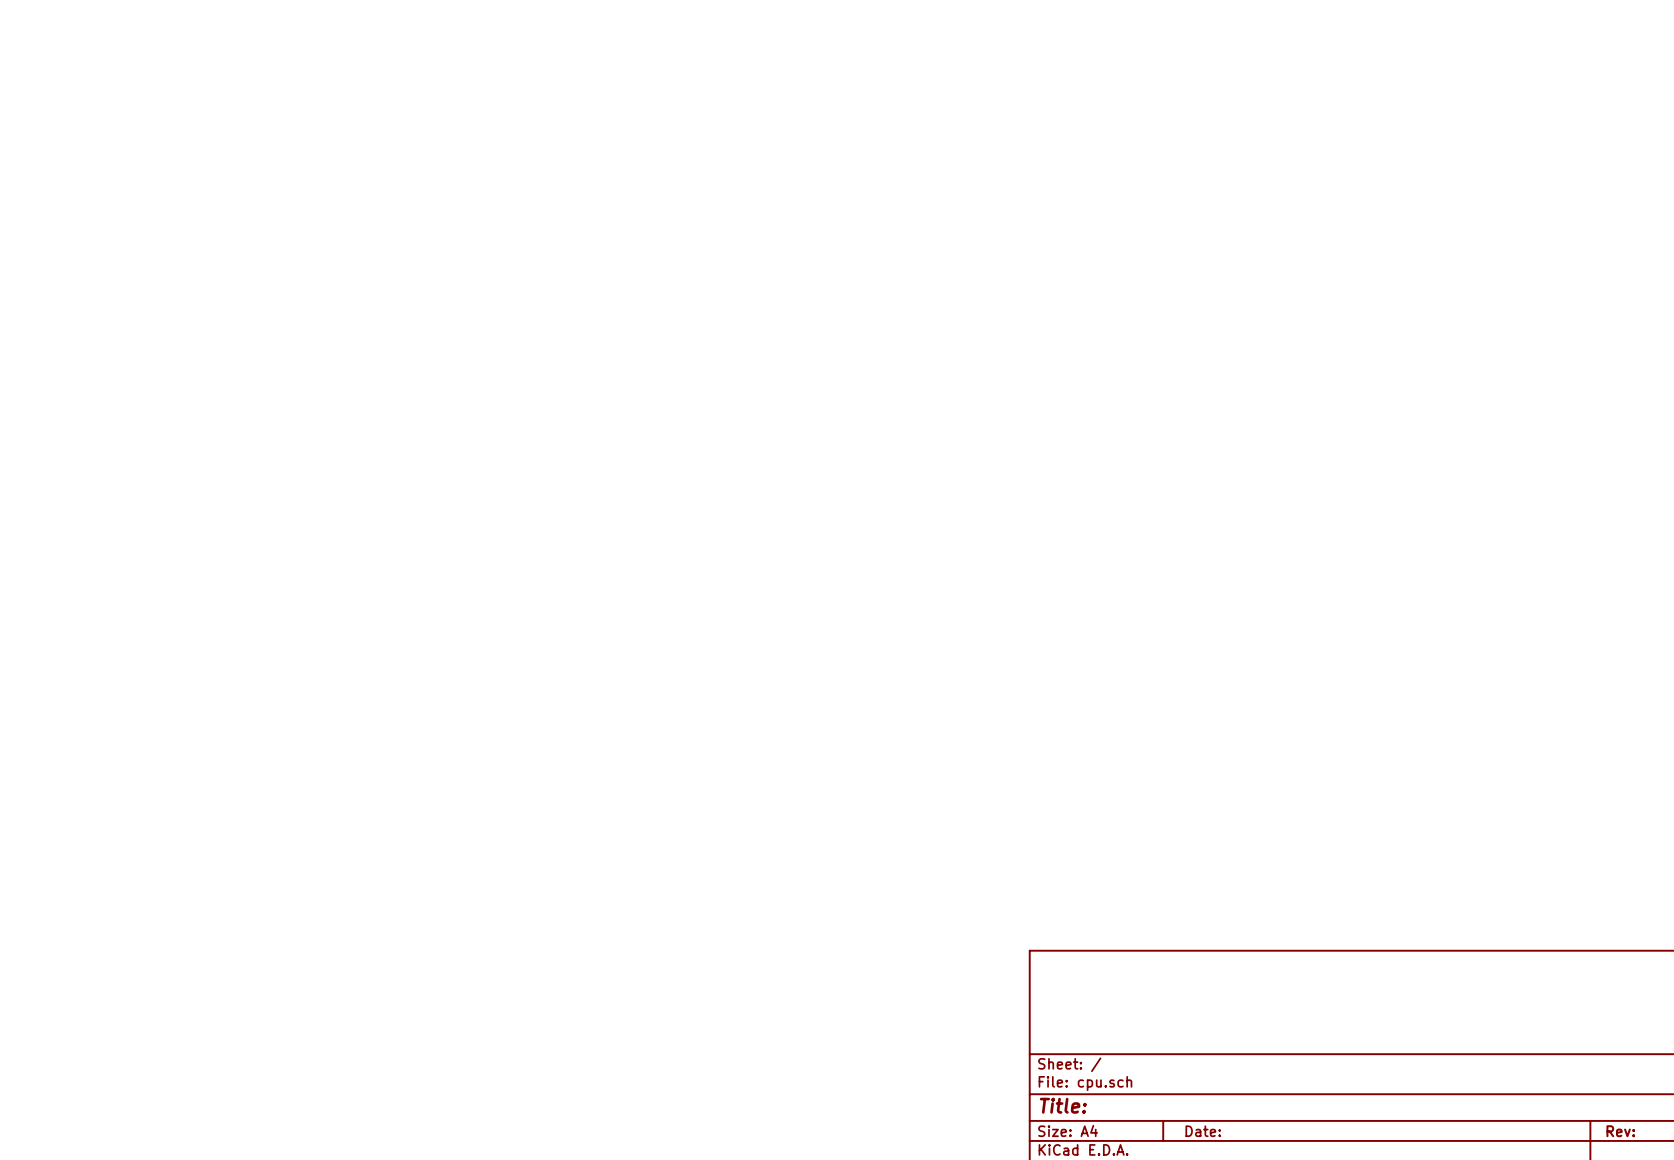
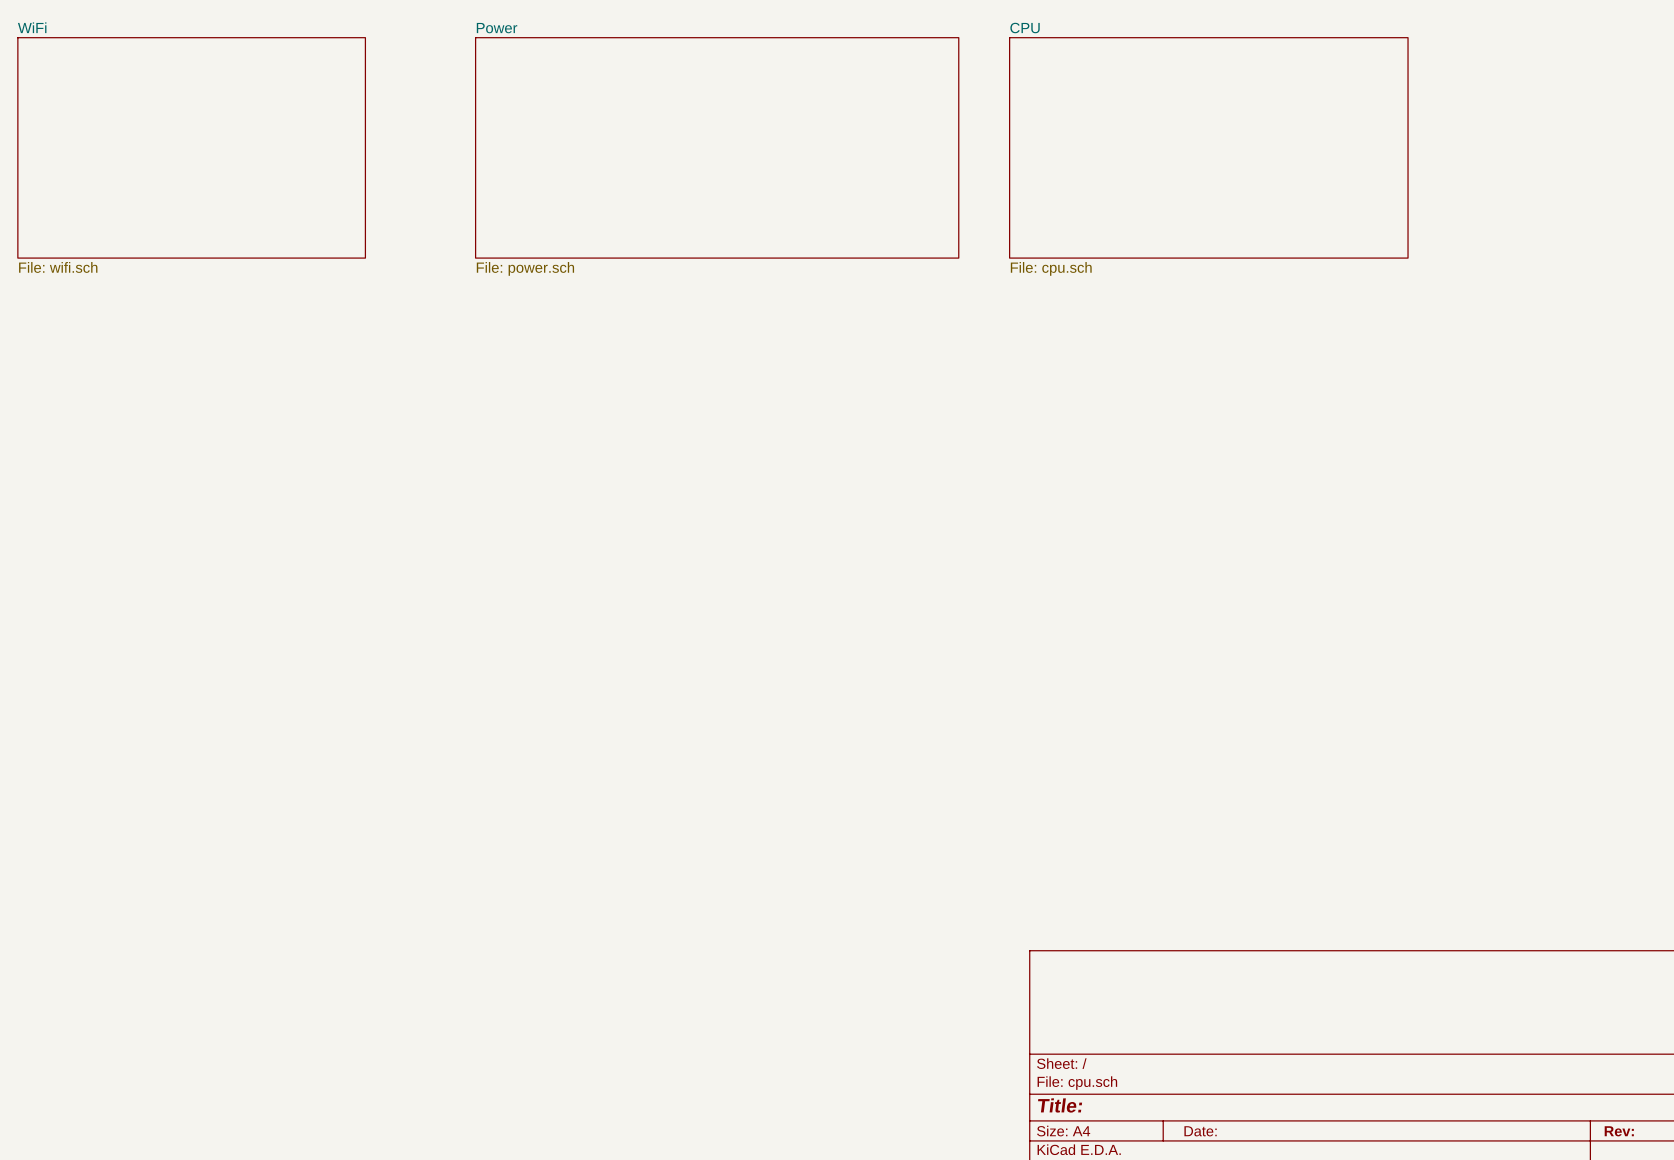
sheet WiFi: none -> File: wifi.sch (191, 147)
sheet Power: none -> File: power.sch (717, 147)
sheet CPU: none -> File: cpu.sch (1208, 147)

